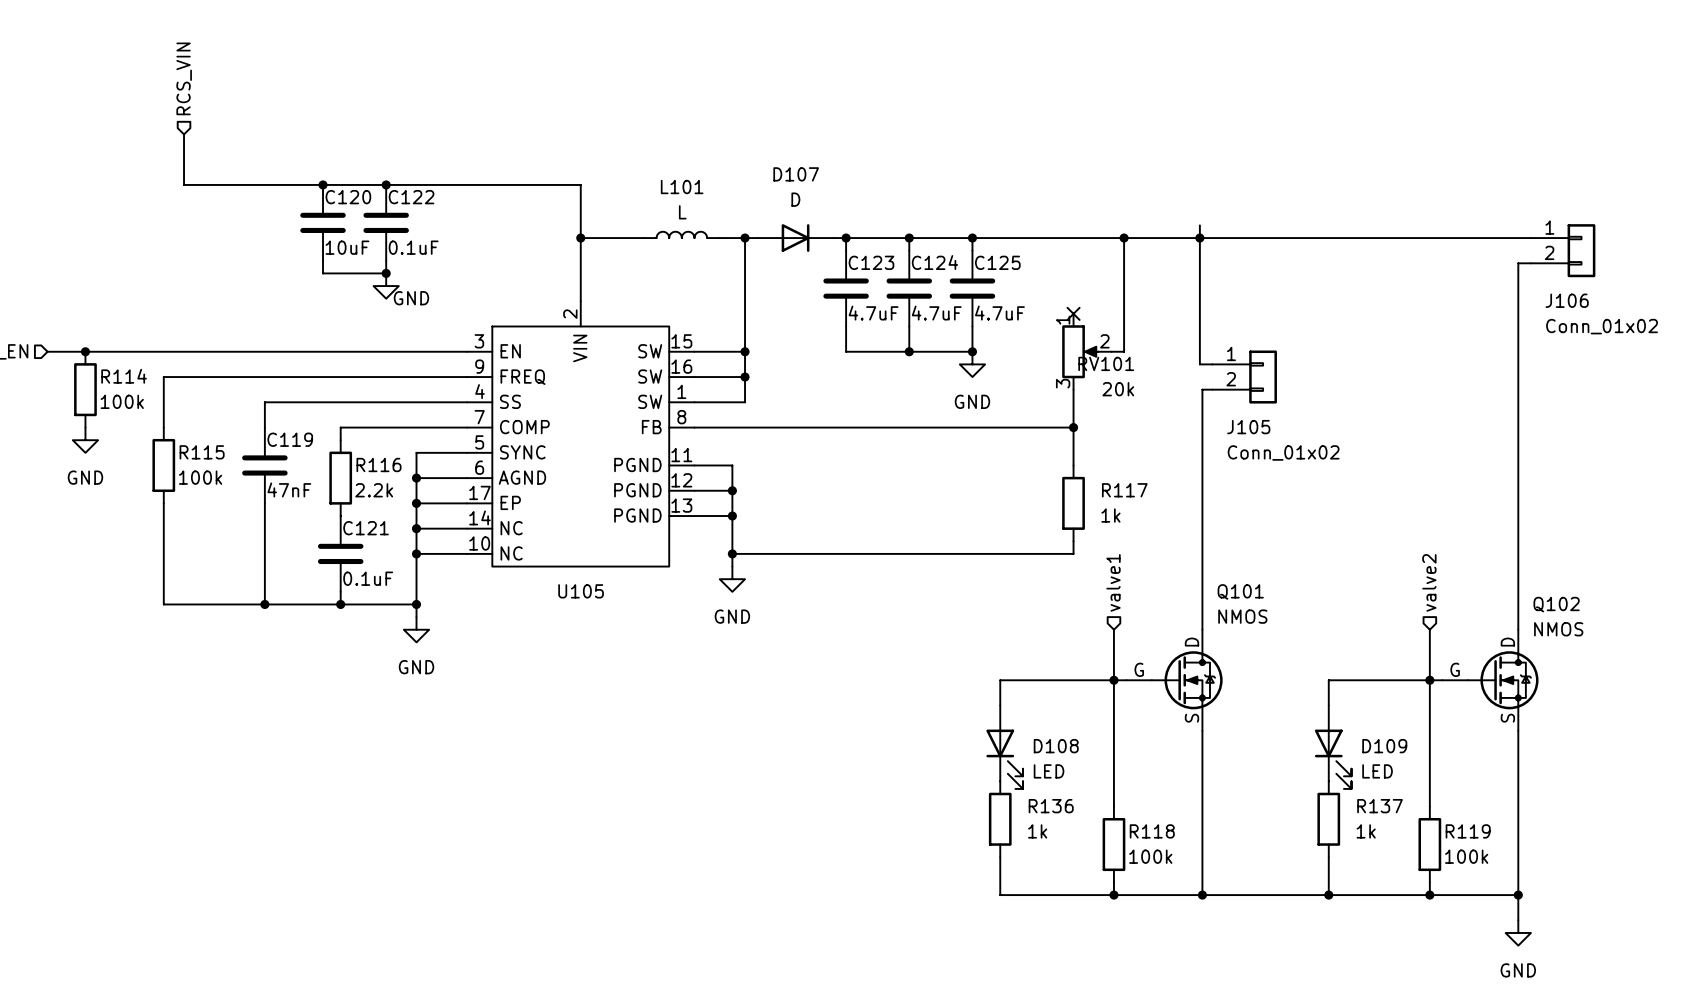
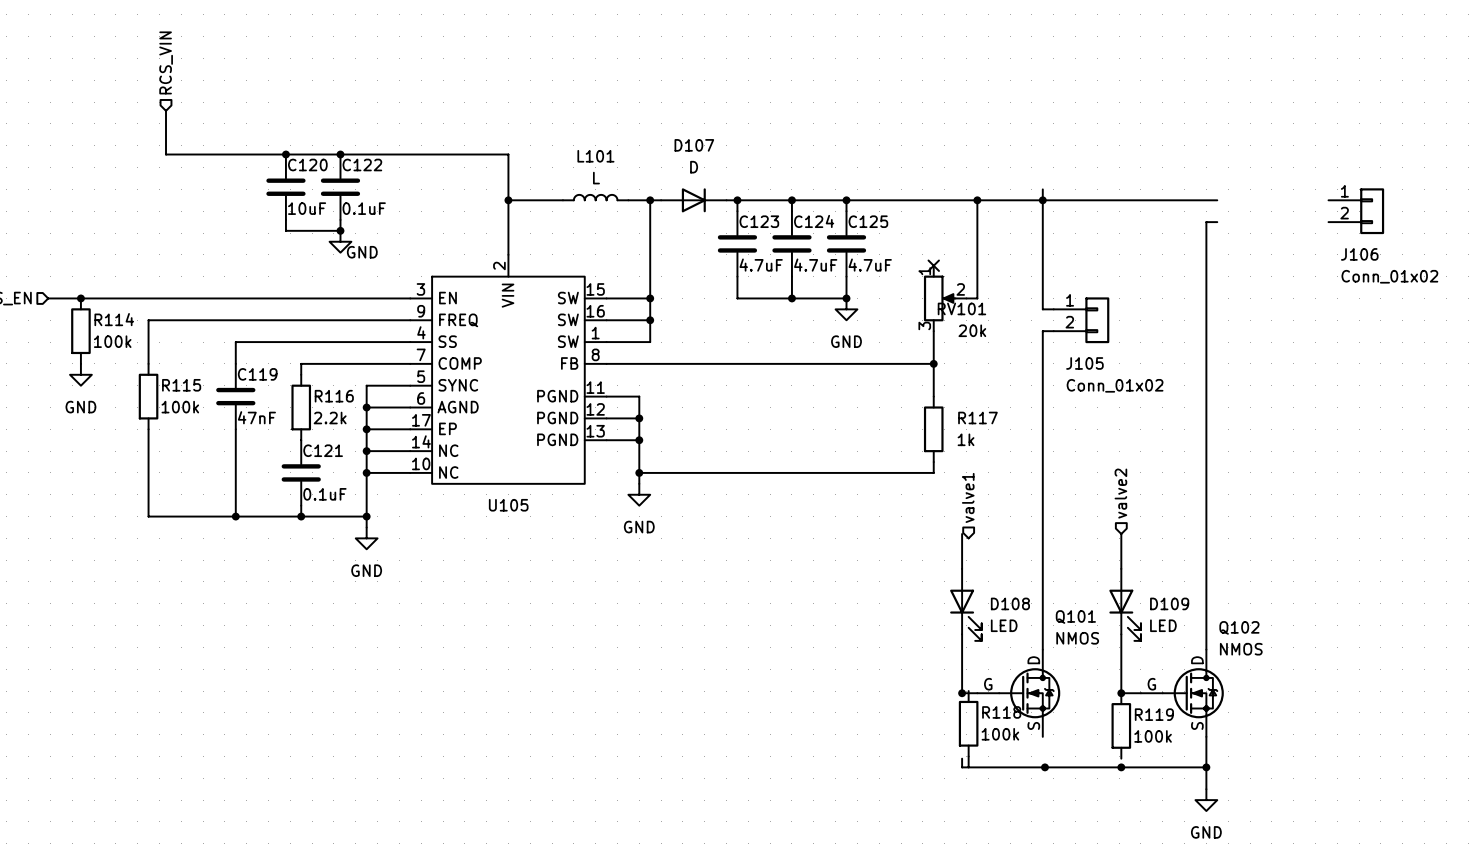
wire: (1402, 238) (1530, 238) -> none
wire: none -> (1217, 222) (1206, 222) (1206, 649)
wire: (1530, 263) (1518, 263) (1518, 629) -> none
wire: (1202, 389) (1202, 629) -> (1044, 331) (1042, 331) (1042, 649)
hierarchical label position: valve2 (1429, 582) -> valve2 (1120, 493)
wire: none -> (962, 534) (962, 568)
wire: none -> (1121, 534) (1121, 568)
wire: (1113, 629) (1113, 806) -> none
wire: (1429, 629) (1429, 806) -> none
junction: (1113, 680) -> none
wire: (1126, 680) (1000, 680) (1000, 705) -> none
Q101 position: (1174, 680) -> (1018, 693)
junction: (1429, 680) -> none
wire: (1442, 680) (1328, 680) (1328, 705) -> none
Q102 position: (1490, 680) -> (1182, 693)
wire: (1202, 730) (1202, 895) -> none
wire: (1518, 730) (1518, 920) -> none
wire: none -> (962, 634) (962, 693) (977, 693)
wire: none -> (1121, 634) (1121, 693) (1140, 693)
D108 position: (1004, 747) -> (965, 604)
D109 position: (1333, 747) -> (1125, 604)
junction: none -> (962, 693)
junction: none -> (1121, 693)
R136: 1k (1000, 819) -> none
R137: 1k (1328, 819) -> none
R119 position: (1429, 844) -> (1121, 725)
wire: (1000, 857) (1000, 895) (1106, 895) -> (962, 758) (962, 767)
wire: (1328, 857) (1328, 895) -> none
wire: none -> (1206, 736) (1206, 789)
wire: (1429, 882) (1429, 895) -> none
junction: (1113, 895) -> none
junction: none -> (1121, 767)
junction: (1328, 895) -> none
wire: (1389, 895) (1518, 895) -> none
junction: none -> (1206, 767)
junction: (1429, 895) -> none
junction: (1518, 895) -> none
power symbol position: GND (1518, 932) -> GND (1206, 800)

